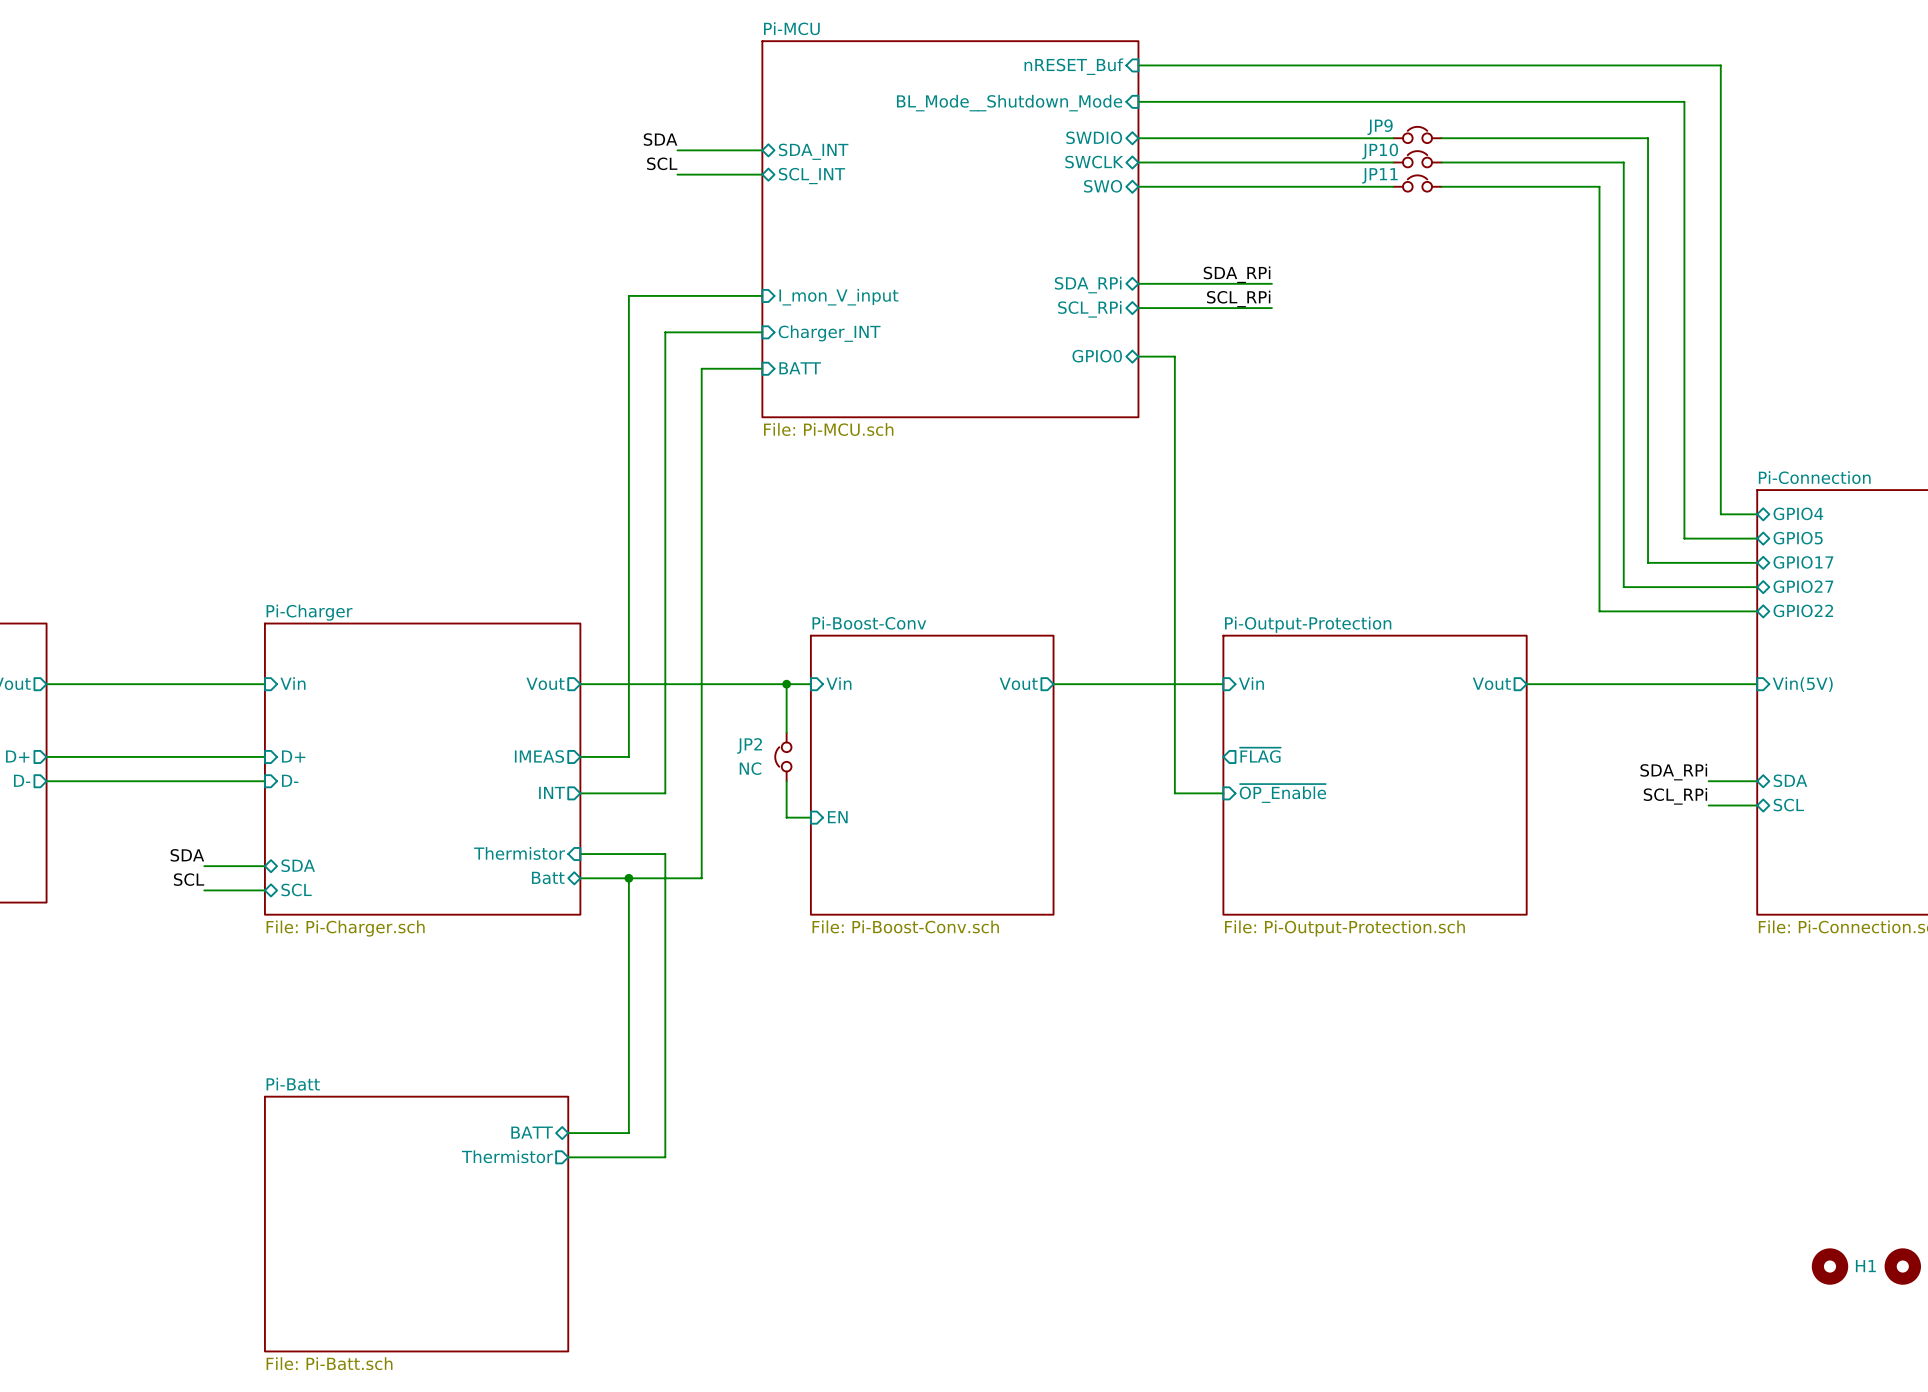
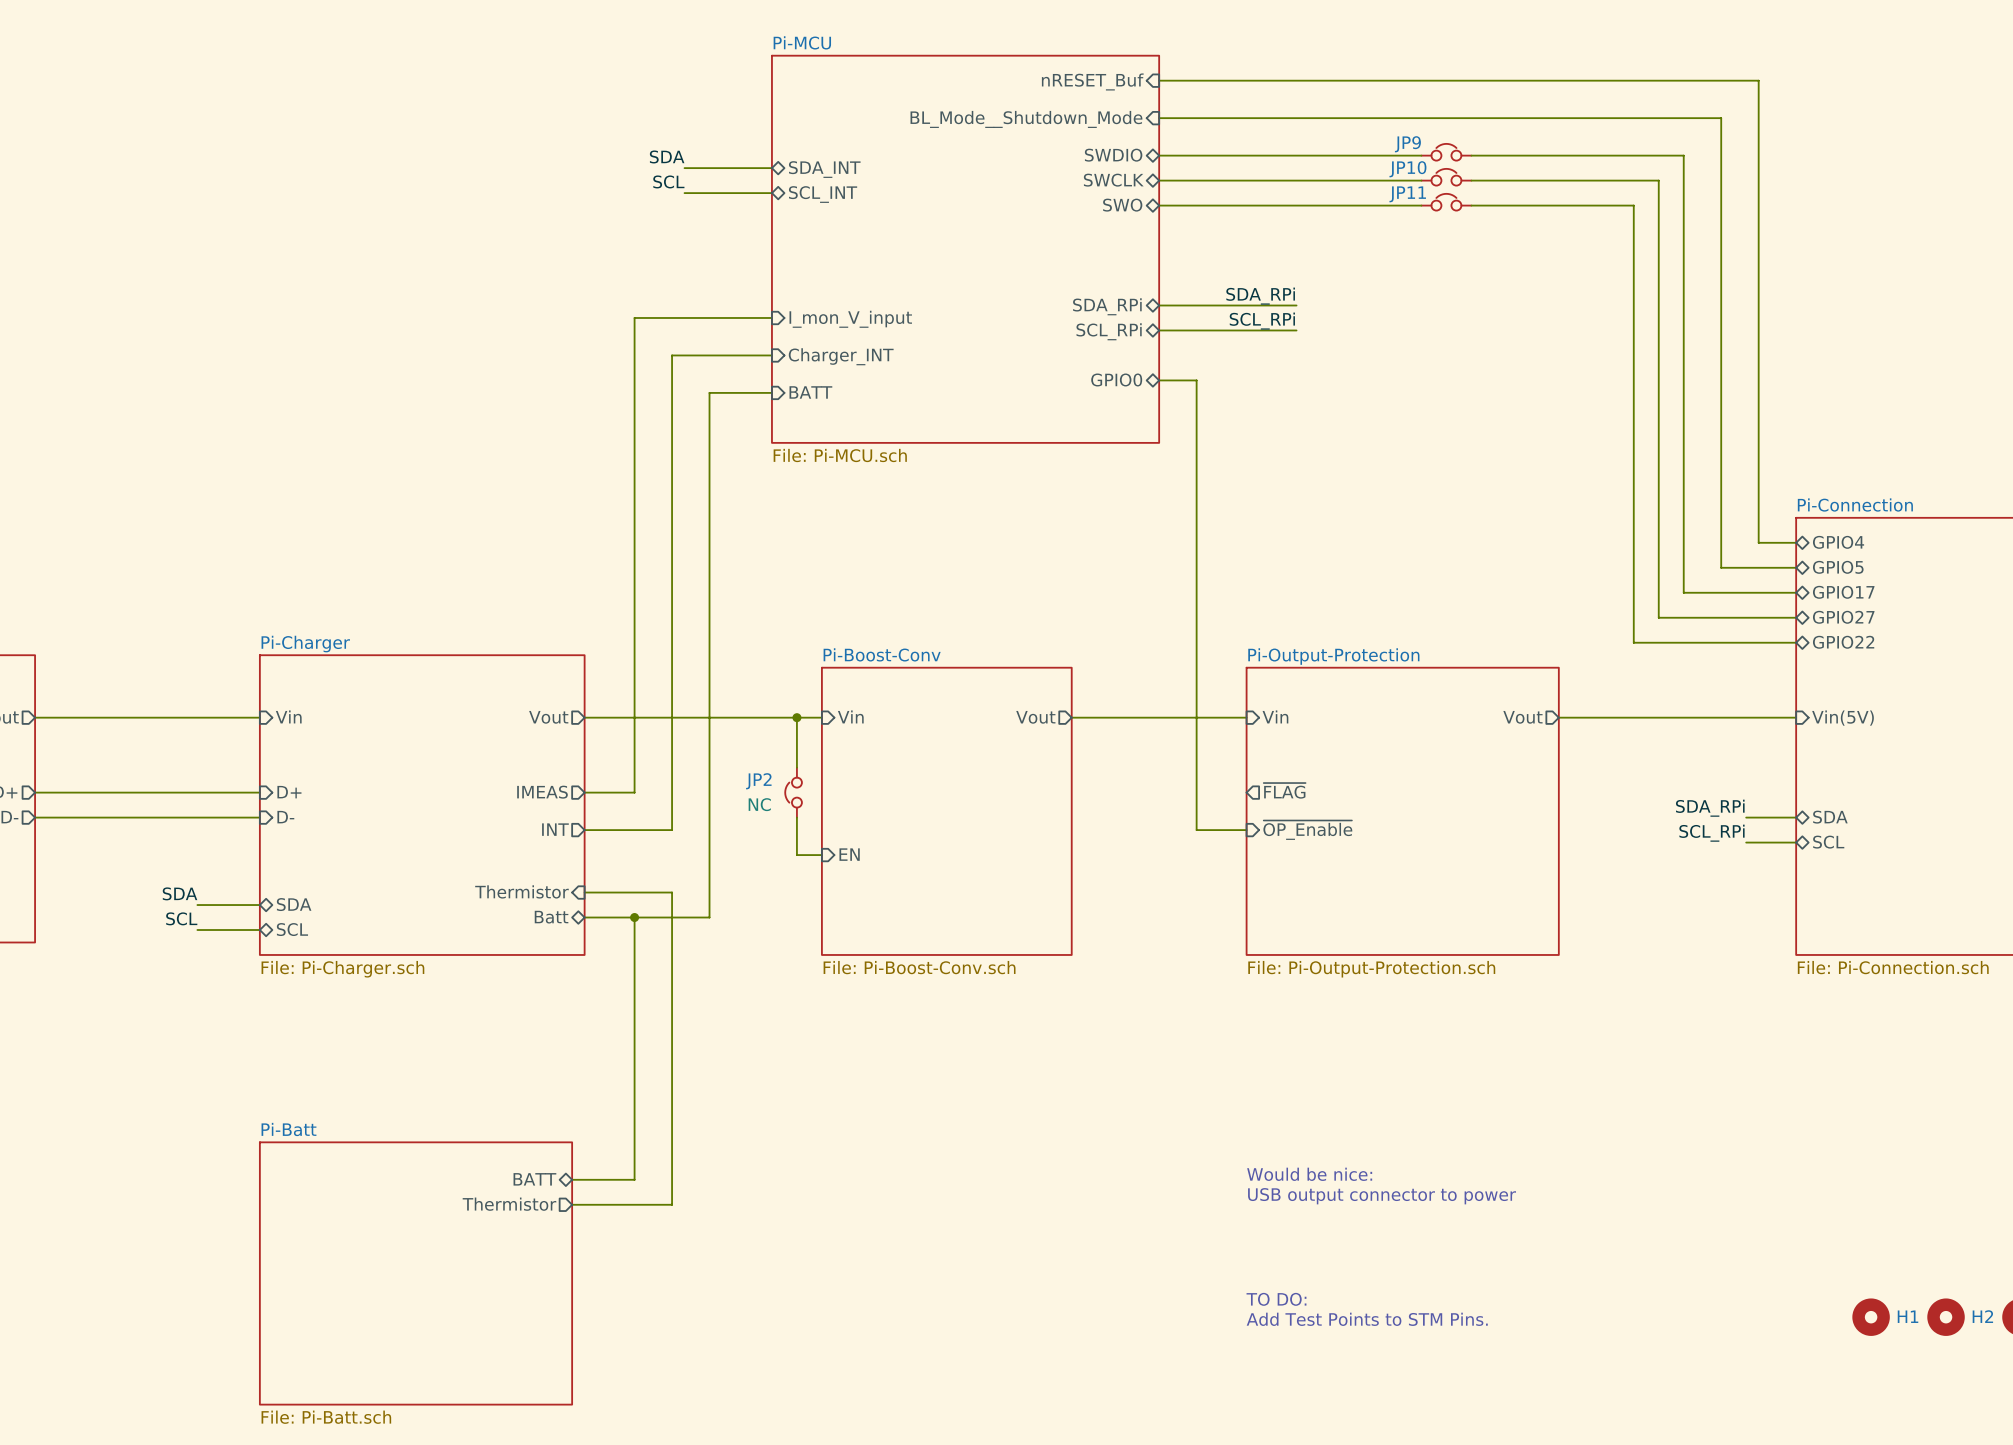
text: none -> Would be nice: (1309, 1174)
text: none -> USB output connector to power (1382, 1196)
text: none -> TO DO: (1276, 1299)
text: none -> Add Test Points to STM Pins. (1367, 1319)

